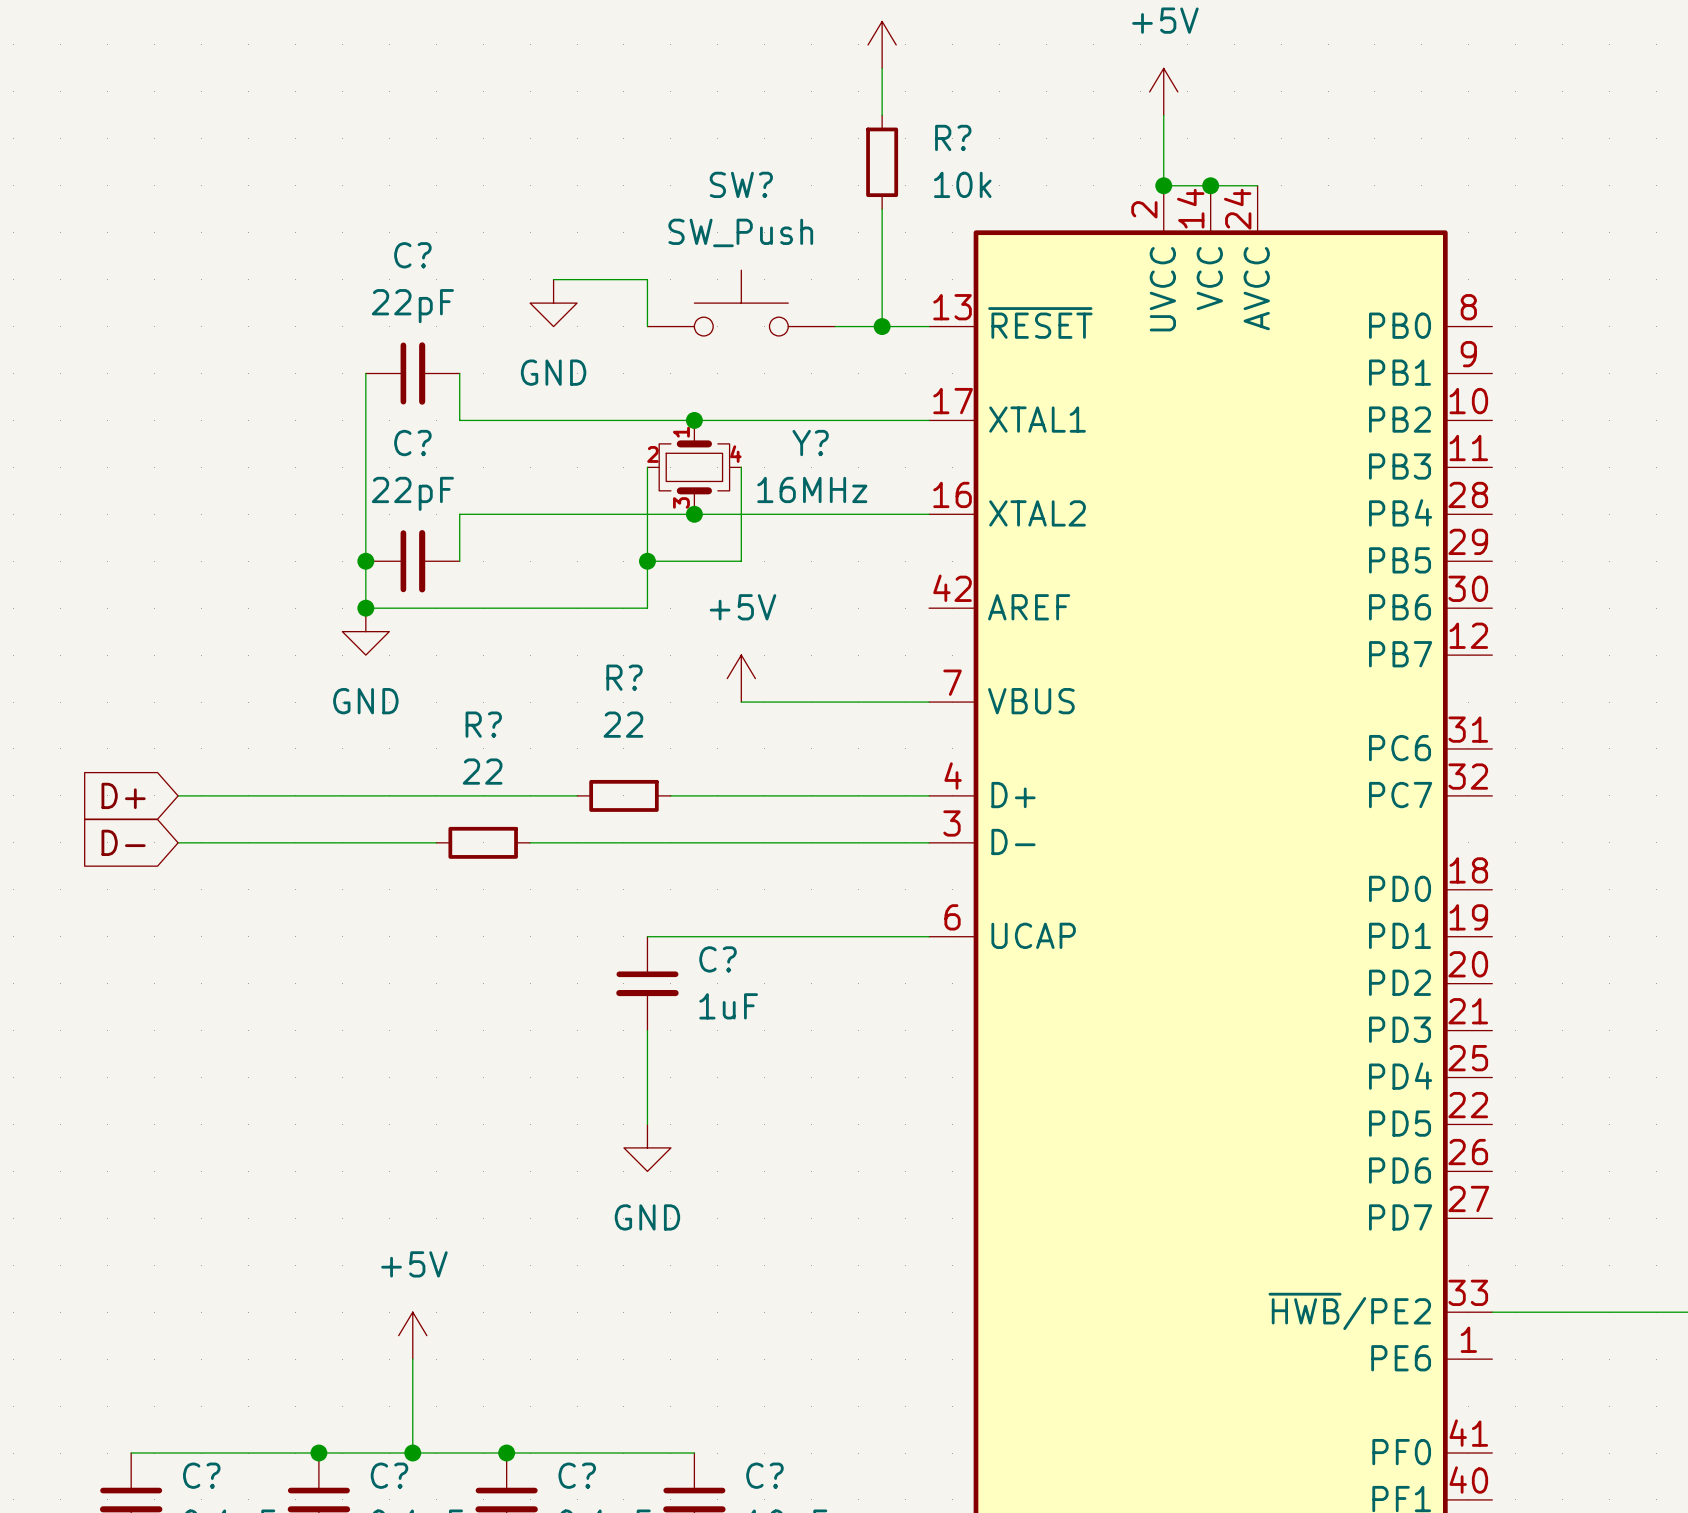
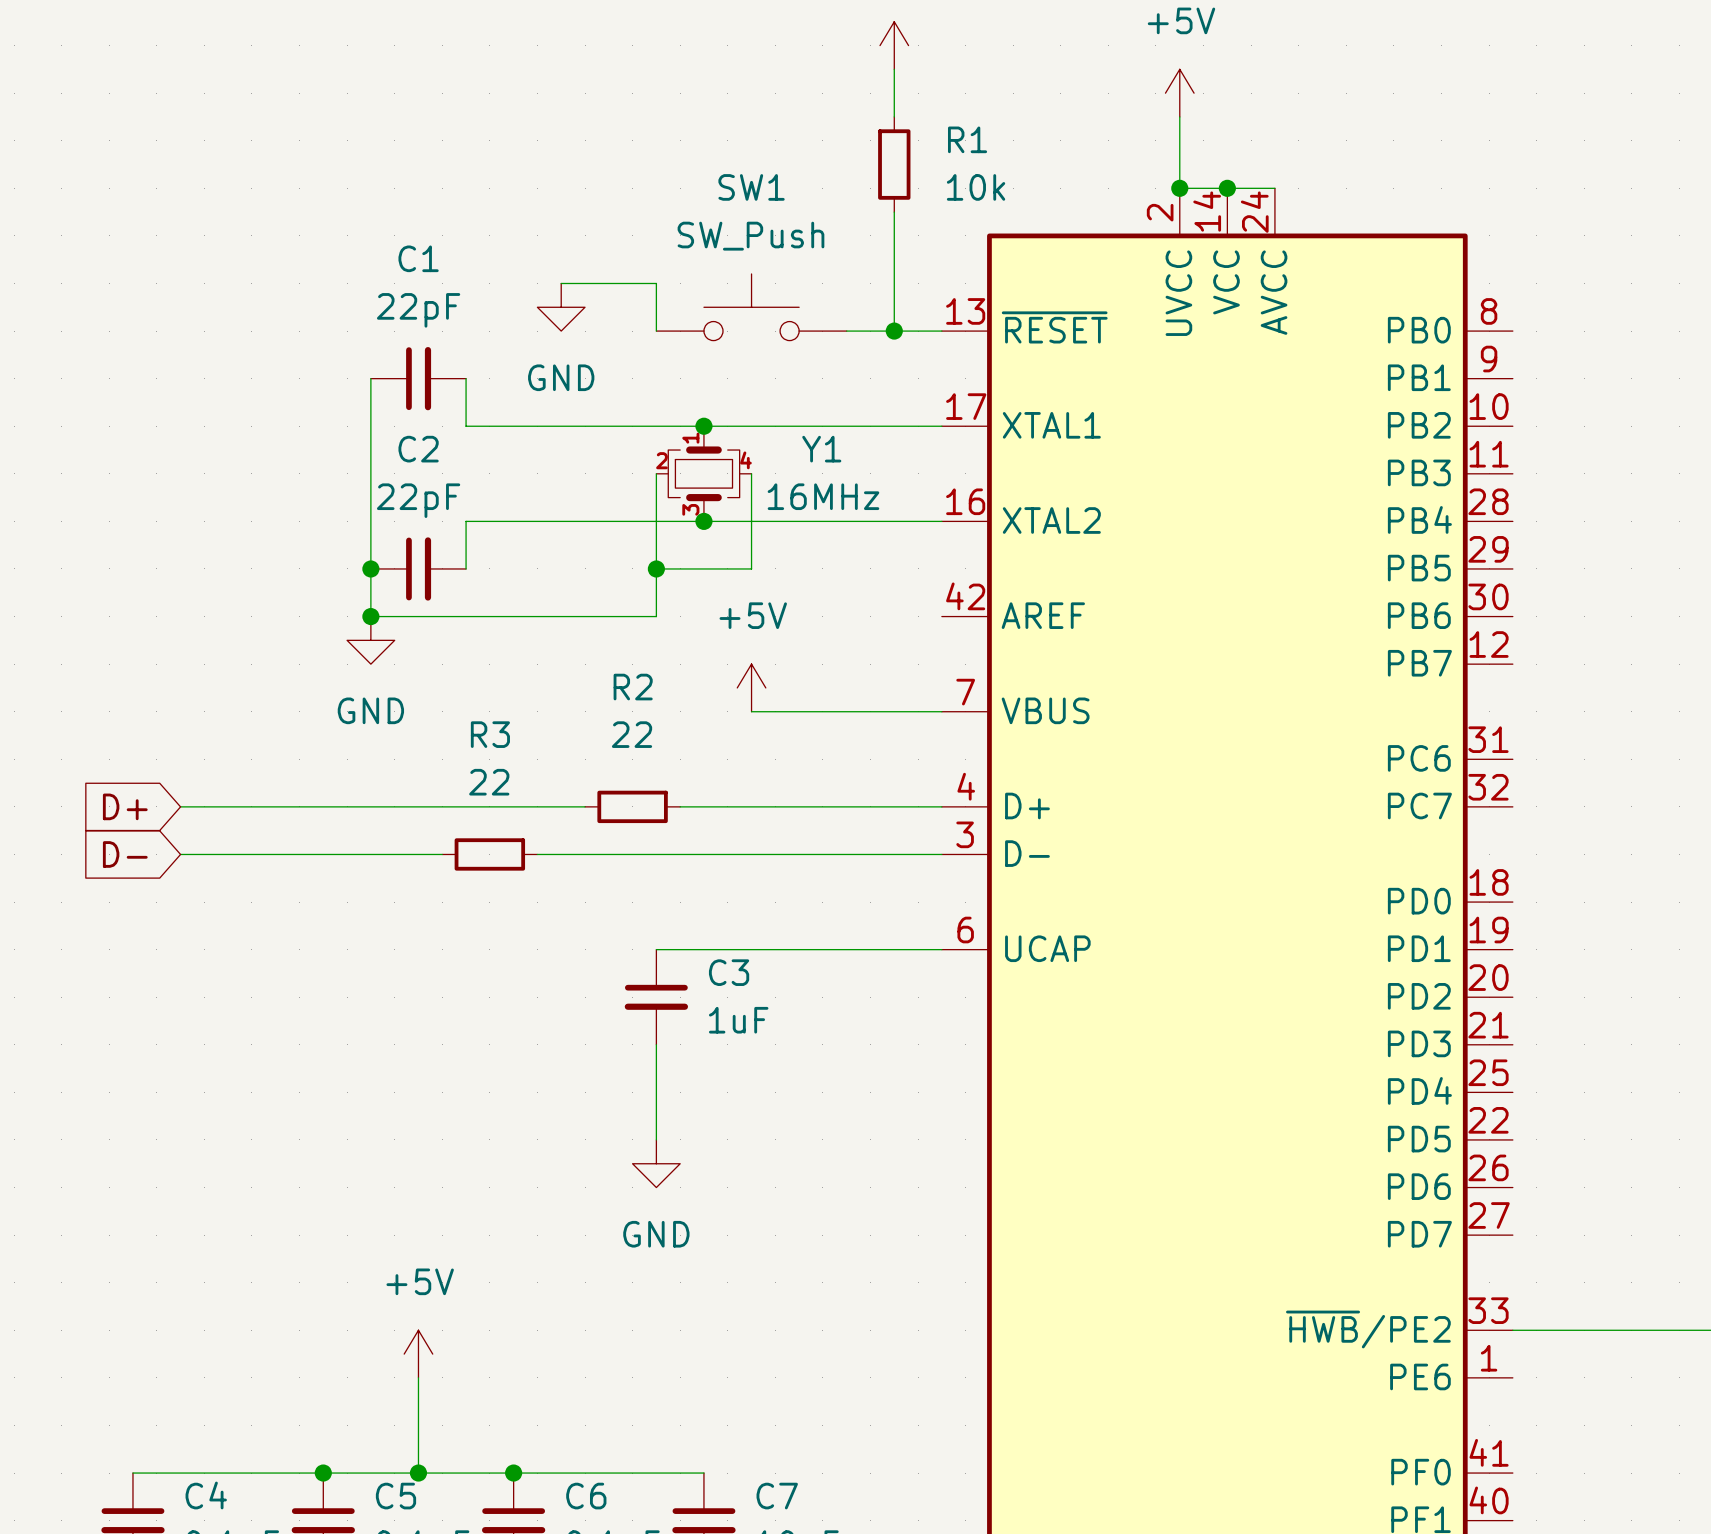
R? name: R? (953, 137) -> R1 (967, 139)
SW? name: SW? (741, 184) -> SW1 (751, 187)
C? name: C? (412, 255) -> C1 (418, 258)
C? name: C? (412, 443) -> C2 (418, 449)
Y? name: Y? (810, 443) -> Y1 (821, 449)
R? name: R? (624, 677) -> R2 (633, 687)
R? name: R? (483, 724) -> R3 (490, 734)
C? name: C? (718, 959) -> C3 (729, 972)
C? name: C? (201, 1475) -> C4 (206, 1495)
C? name: C? (389, 1475) -> C5 (395, 1496)
C? name: C? (577, 1475) -> C6 (586, 1496)
C? name: C? (764, 1475) -> C7 (777, 1496)

